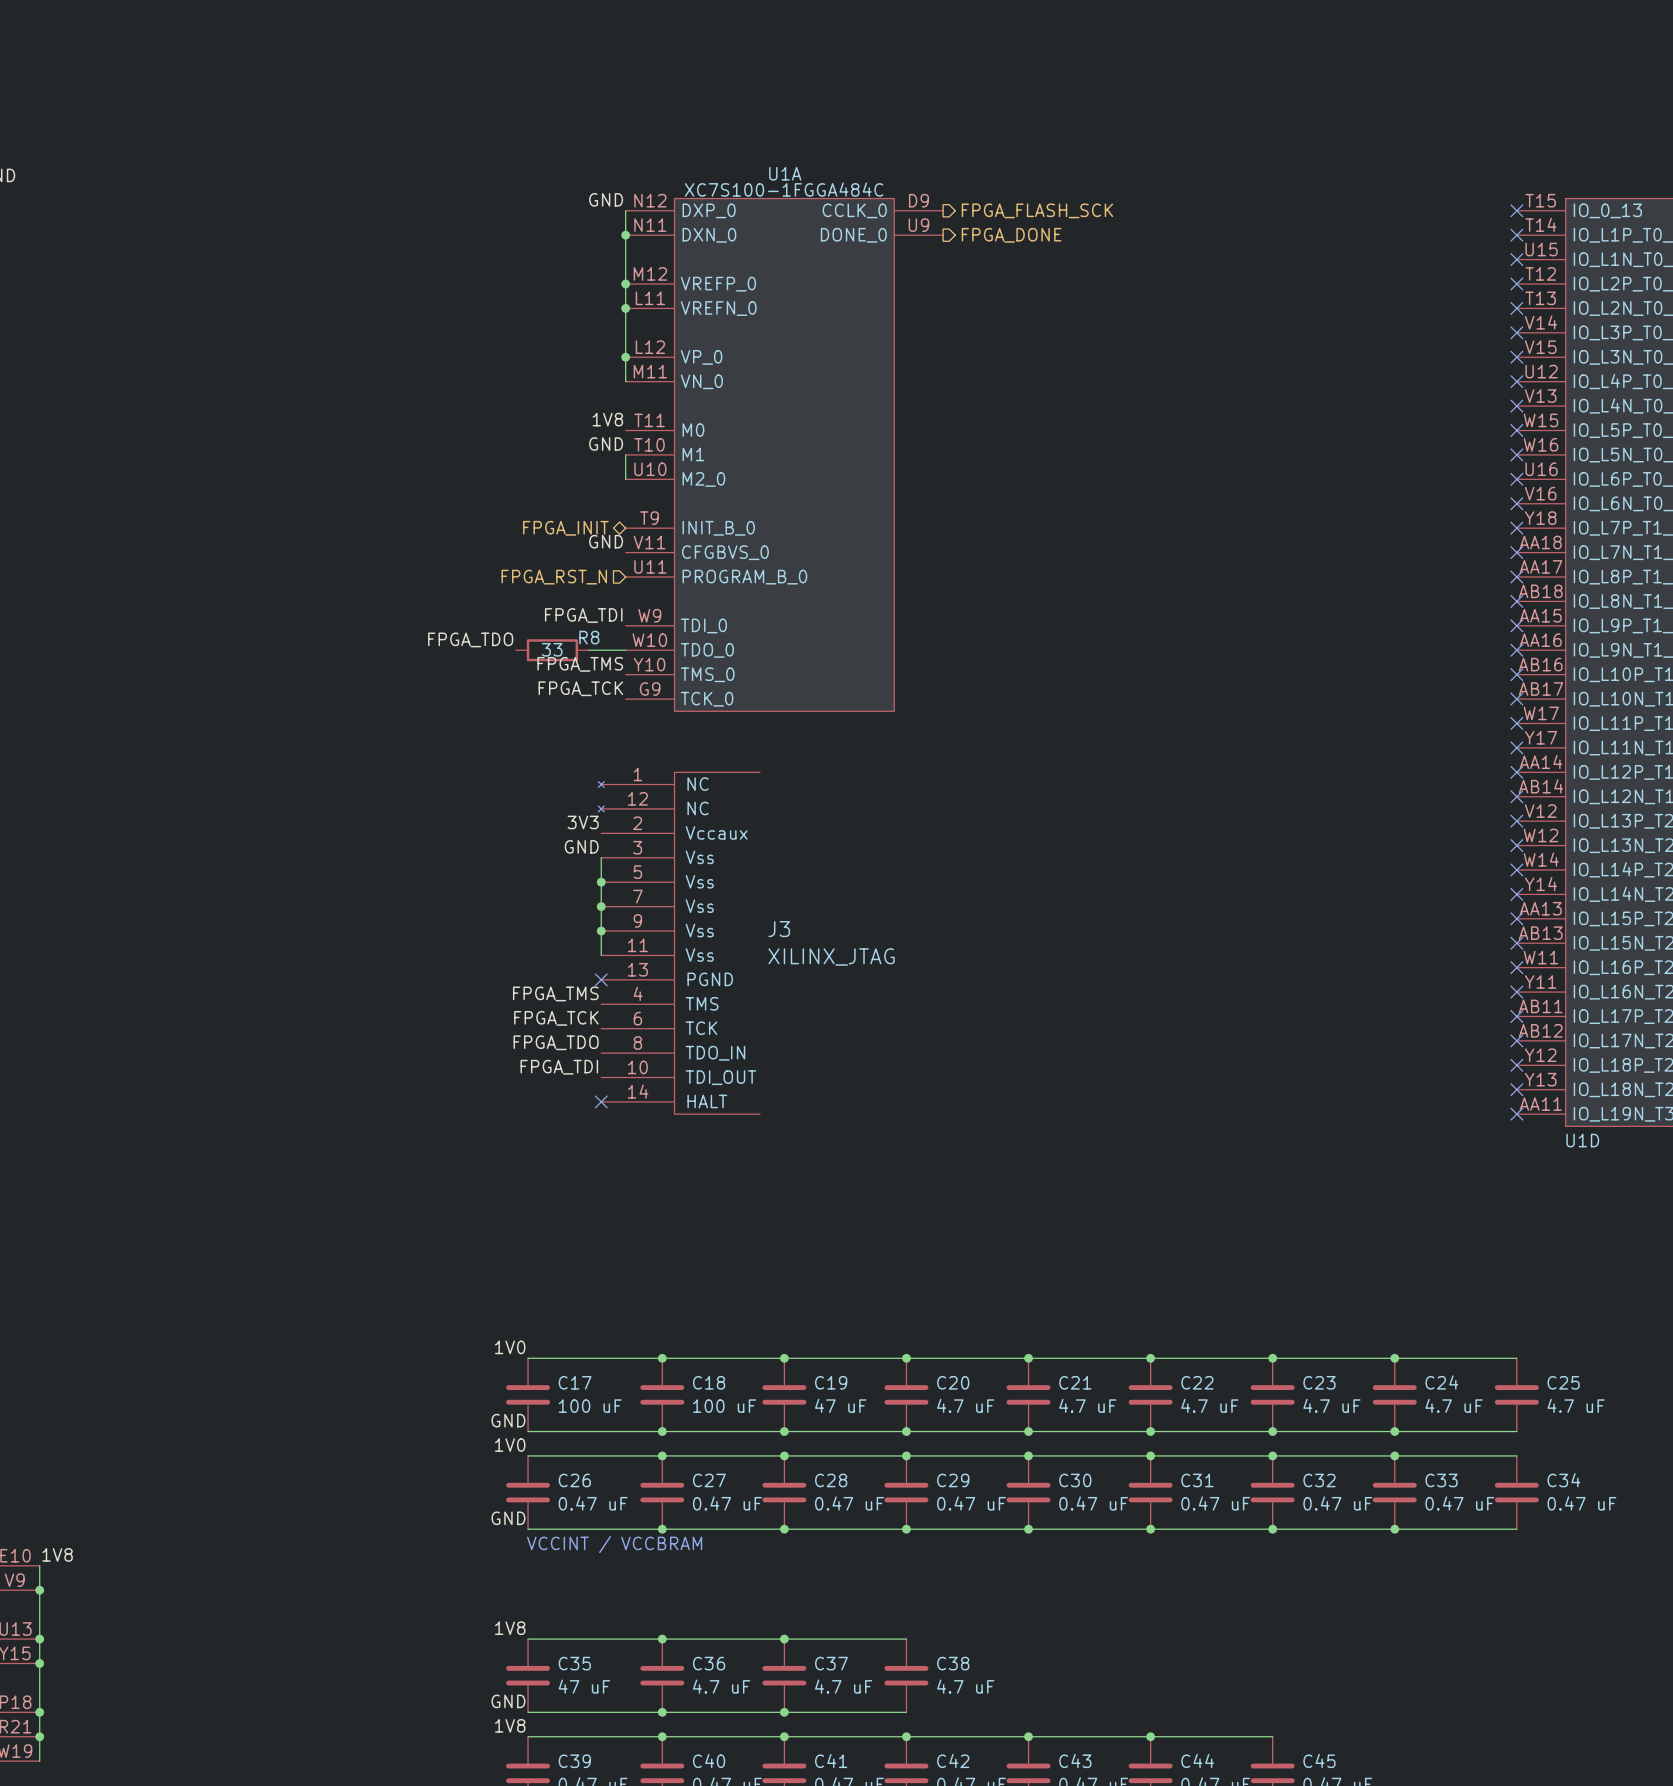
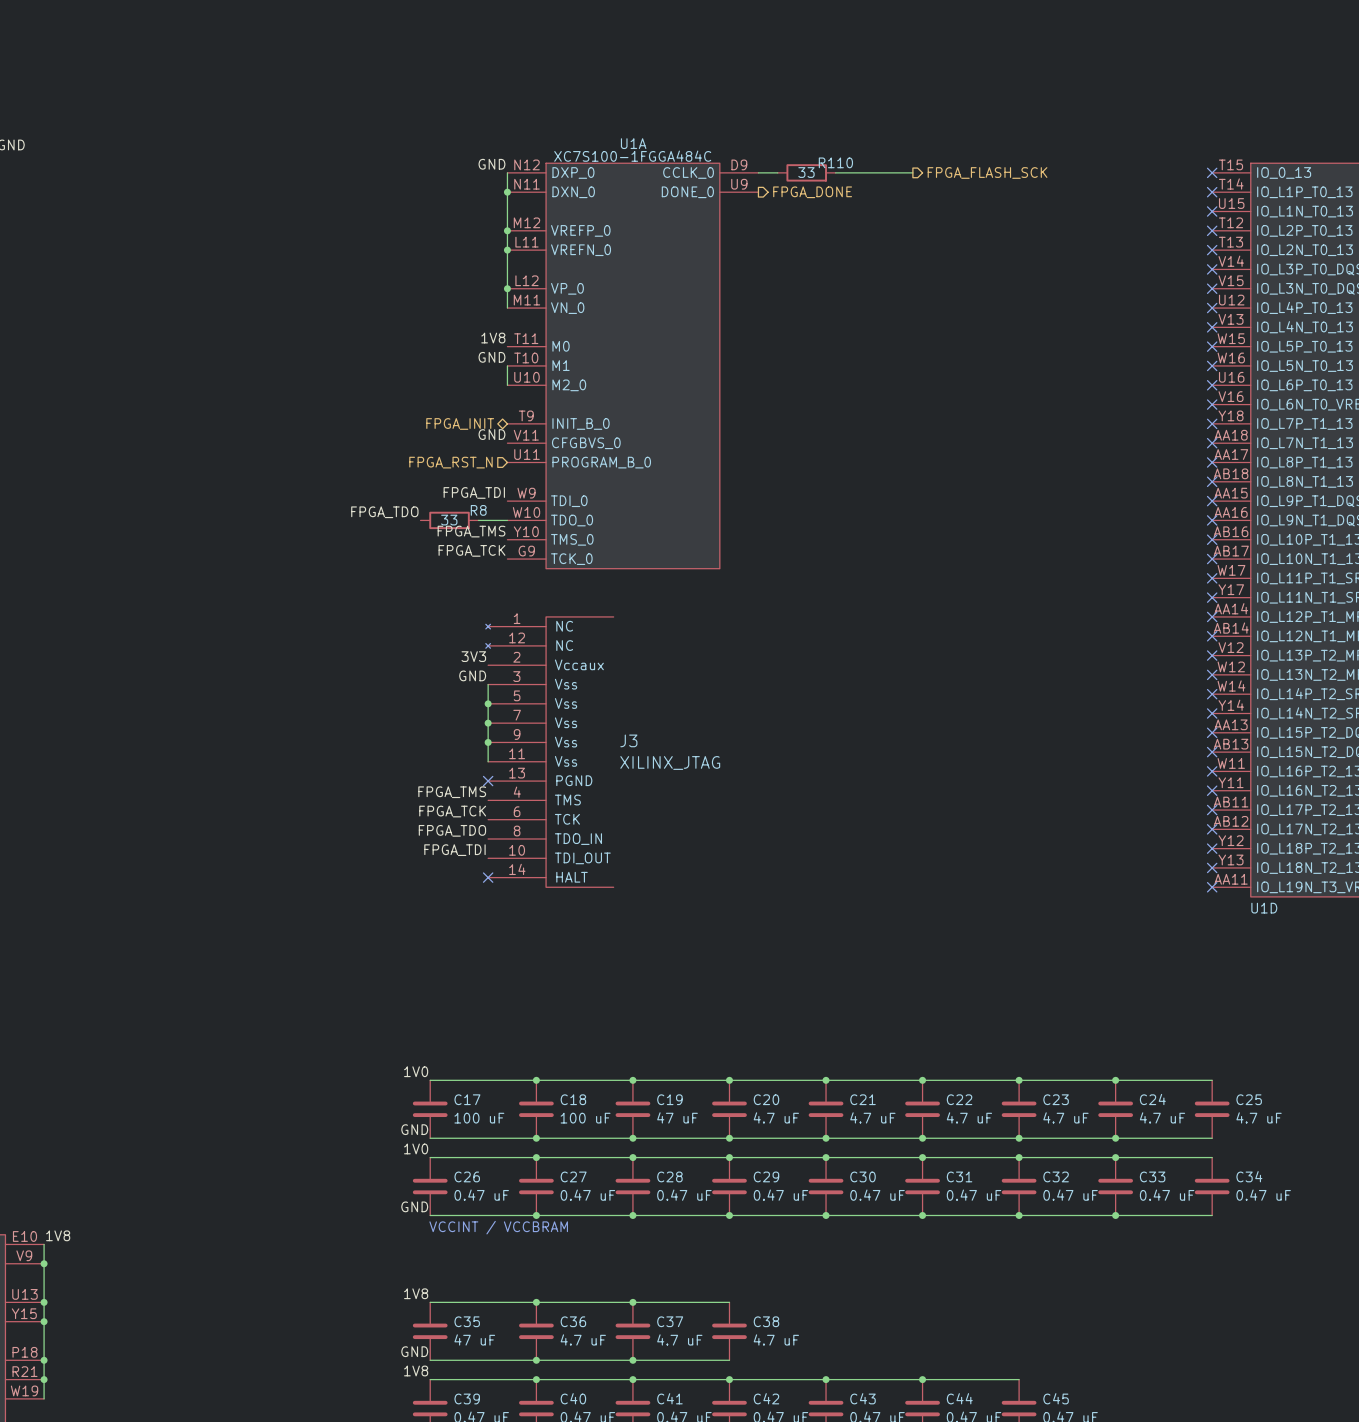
wire: none -> (758, 172) (777, 172)
R110: none -> 33 (806, 172)
hierarchical label position: FPGA_FLASH_SCK (1037, 210) -> FPGA_FLASH_SCK (987, 172)
wire: none -> (835, 172) (912, 172)

